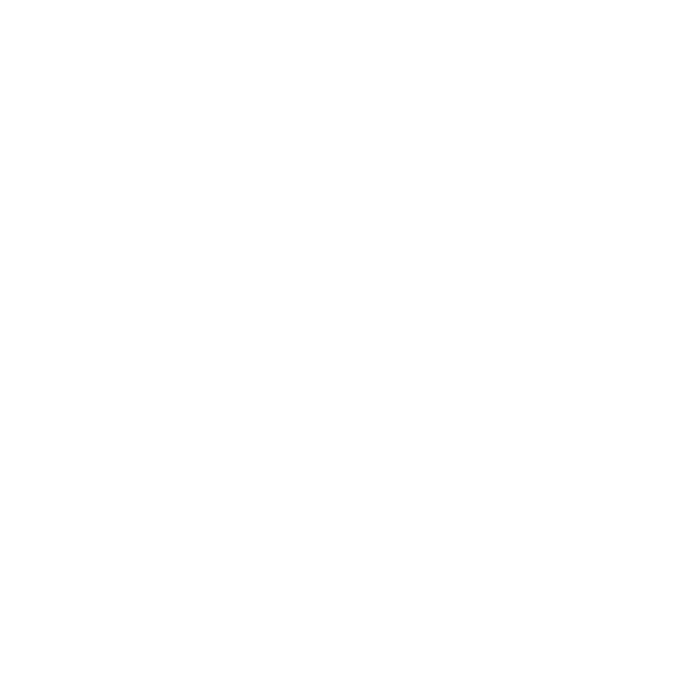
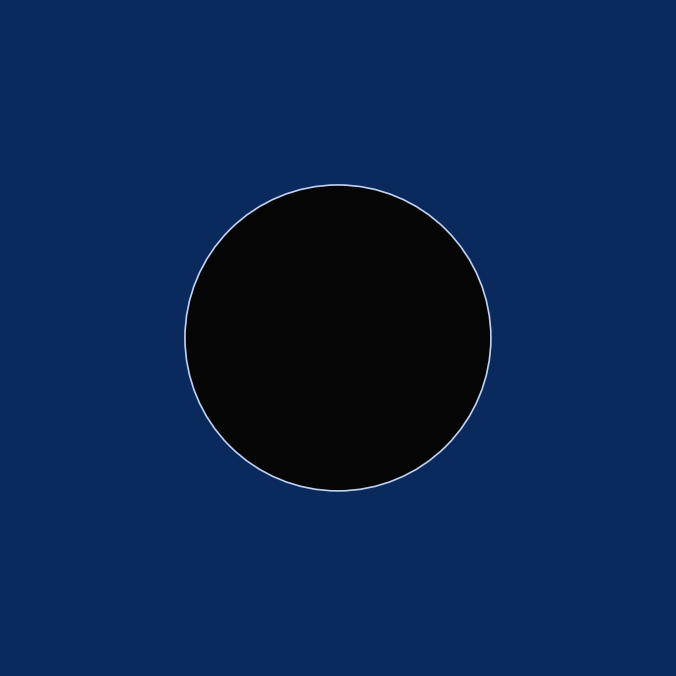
part: none -> (337, 337)

